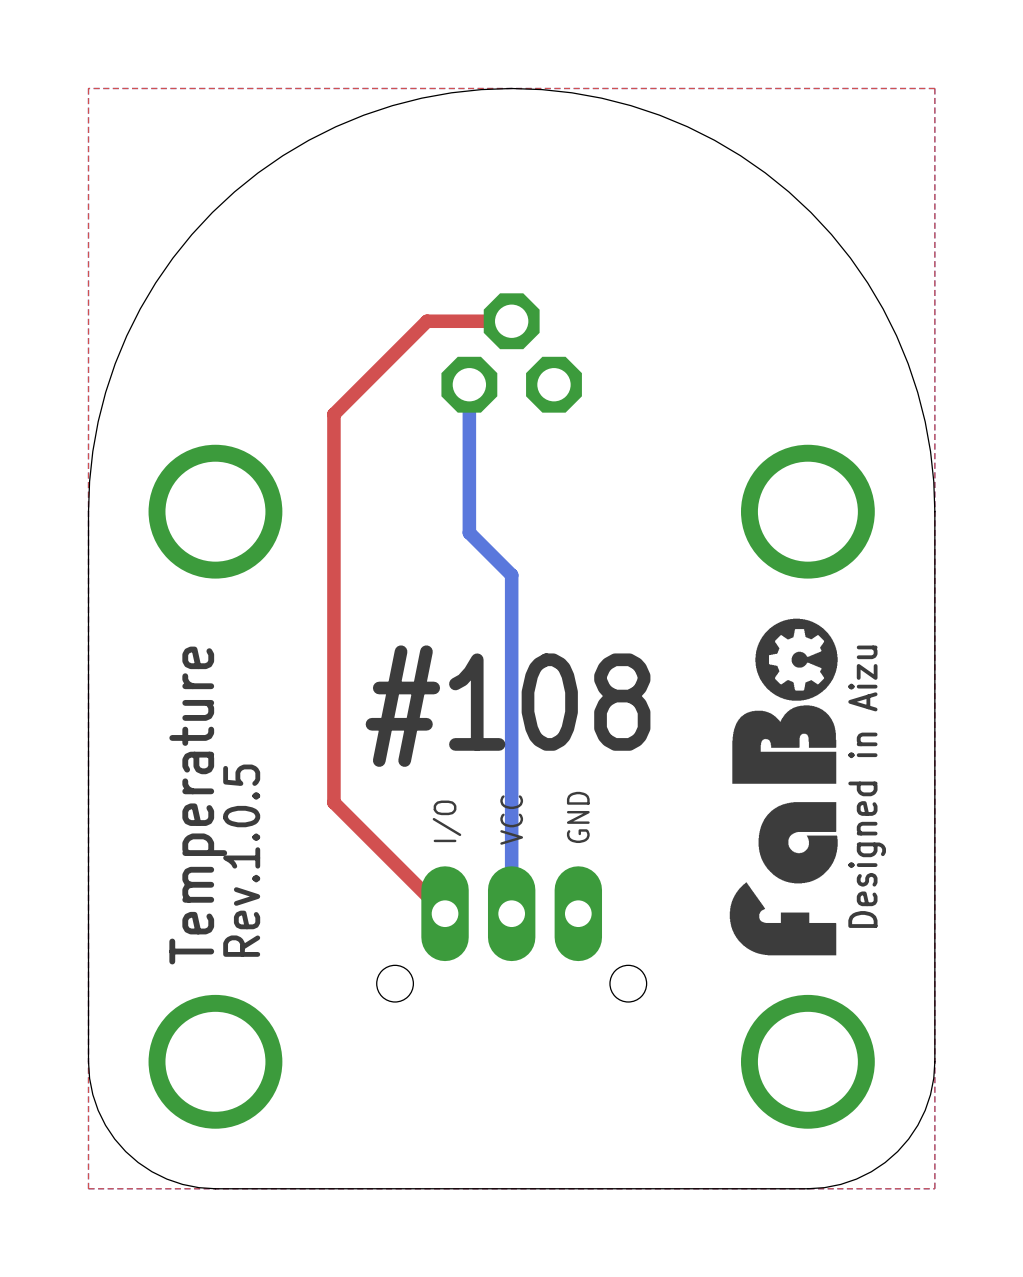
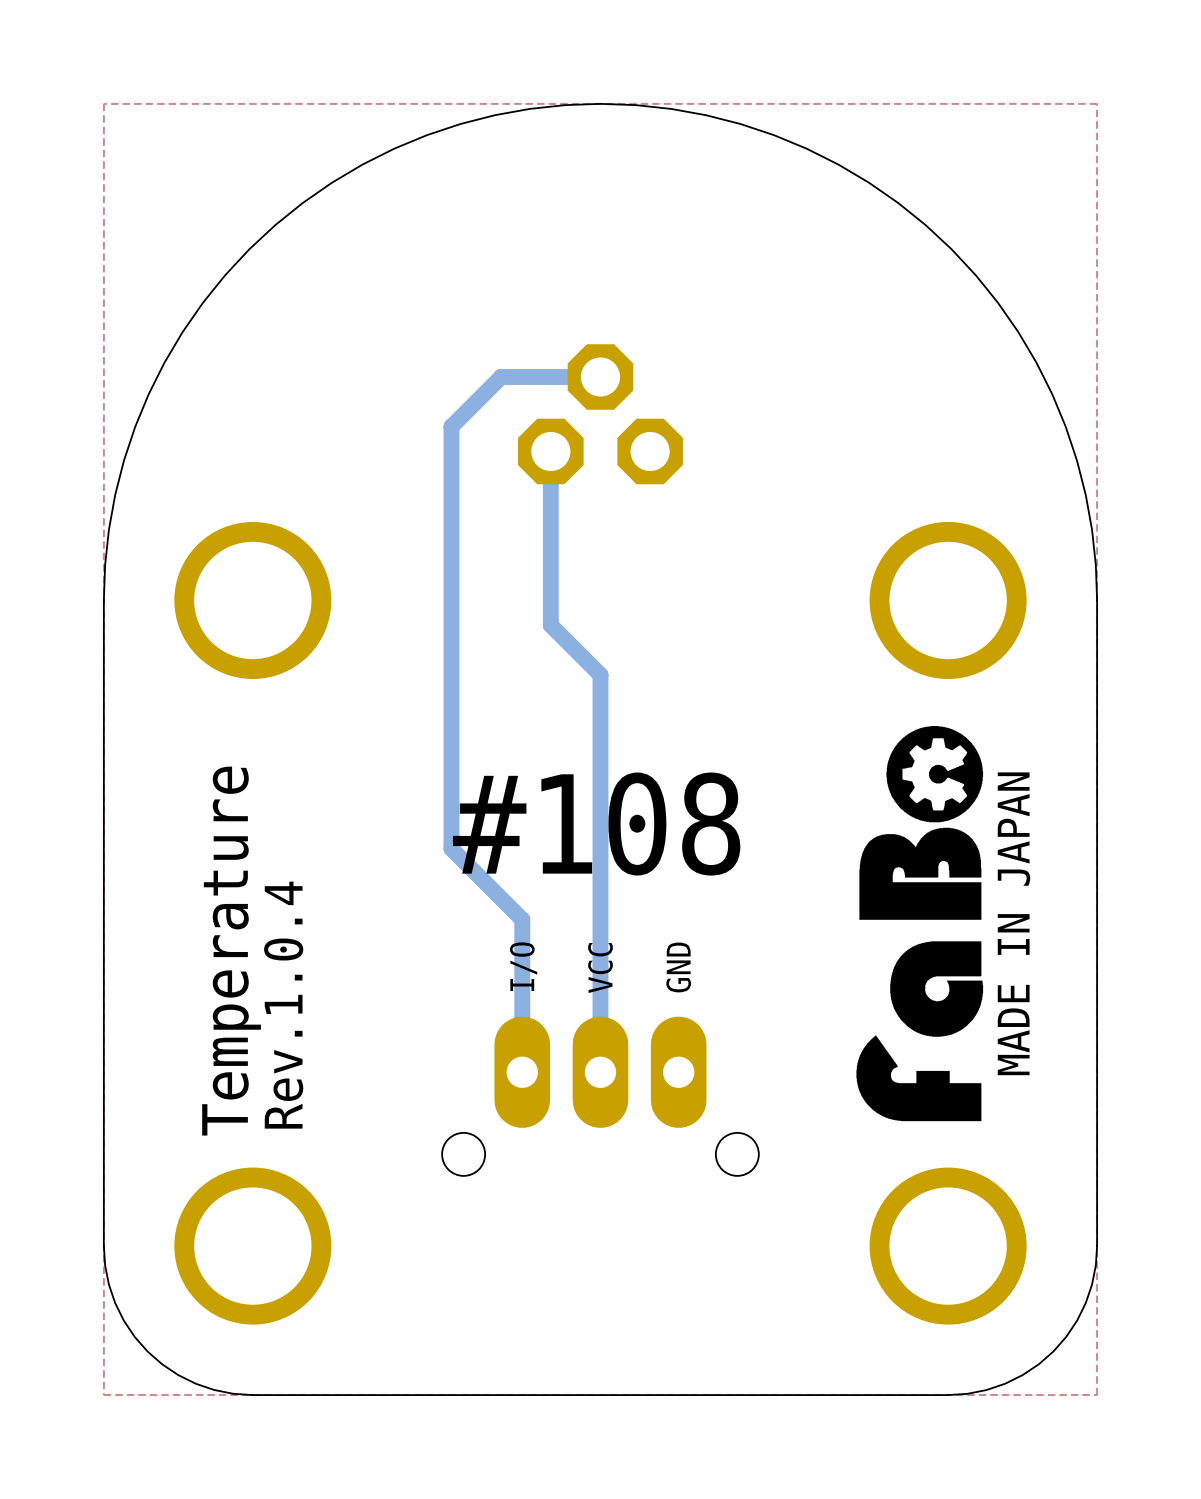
top track: (511, 321) (427, 321) (333, 414) (333, 802) (445, 913) -> none
bottom track: none -> (600, 377) (501, 377) (451, 426) (451, 848) (522, 919) (522, 1072)
text: Designed in Aizu (867, 786) -> MADE IN JAPAN (1013, 923)
text: Rev.1.0.5 (241, 860) -> Rev.1.0.4 (283, 1005)

